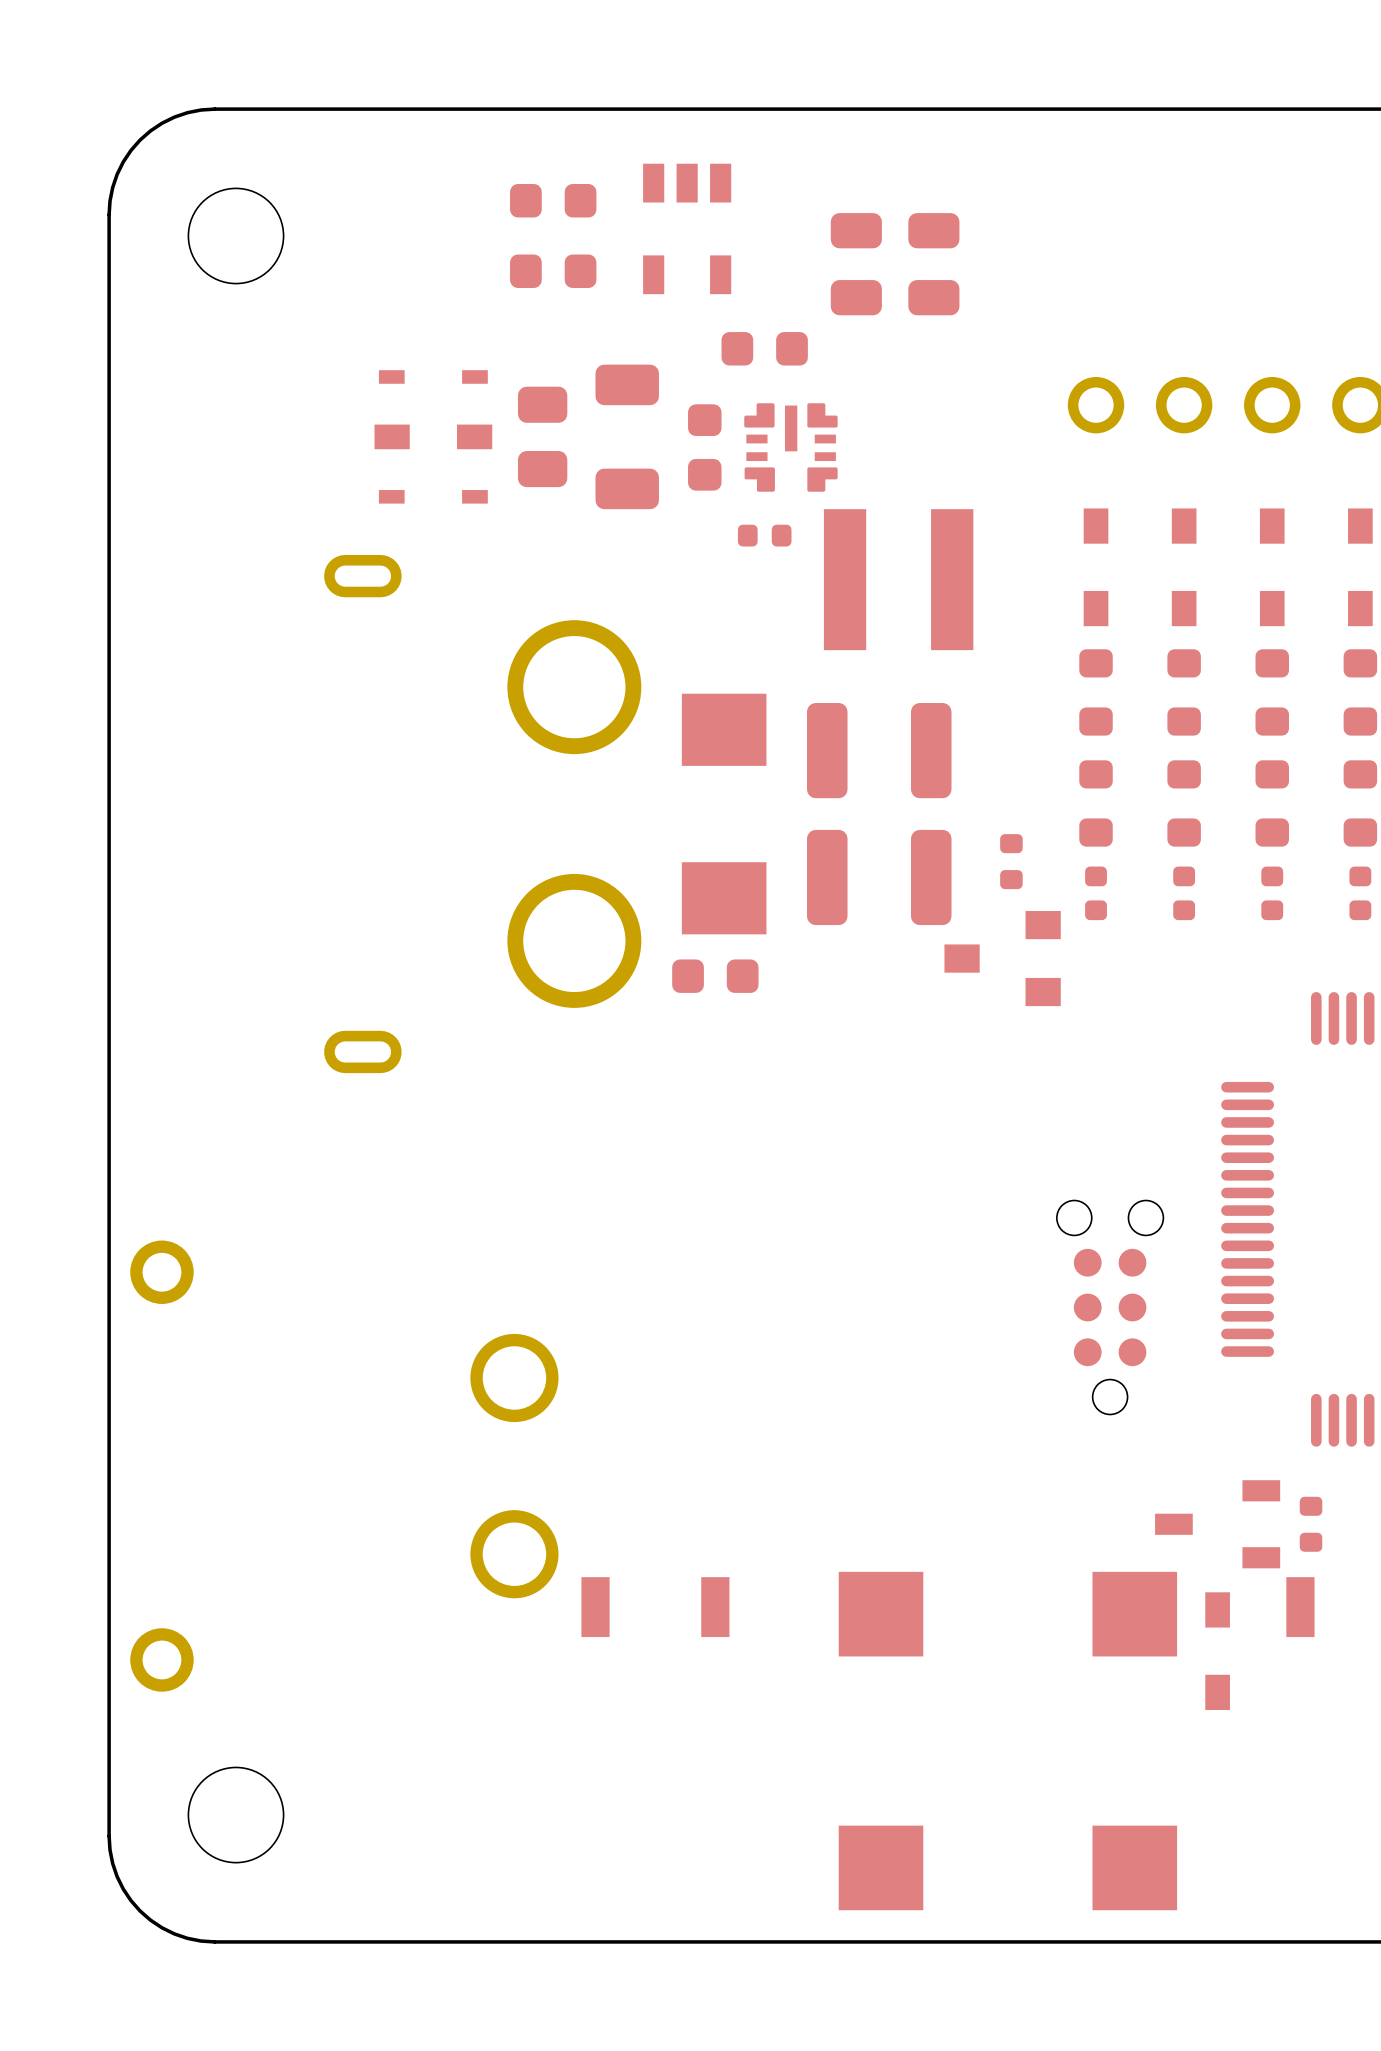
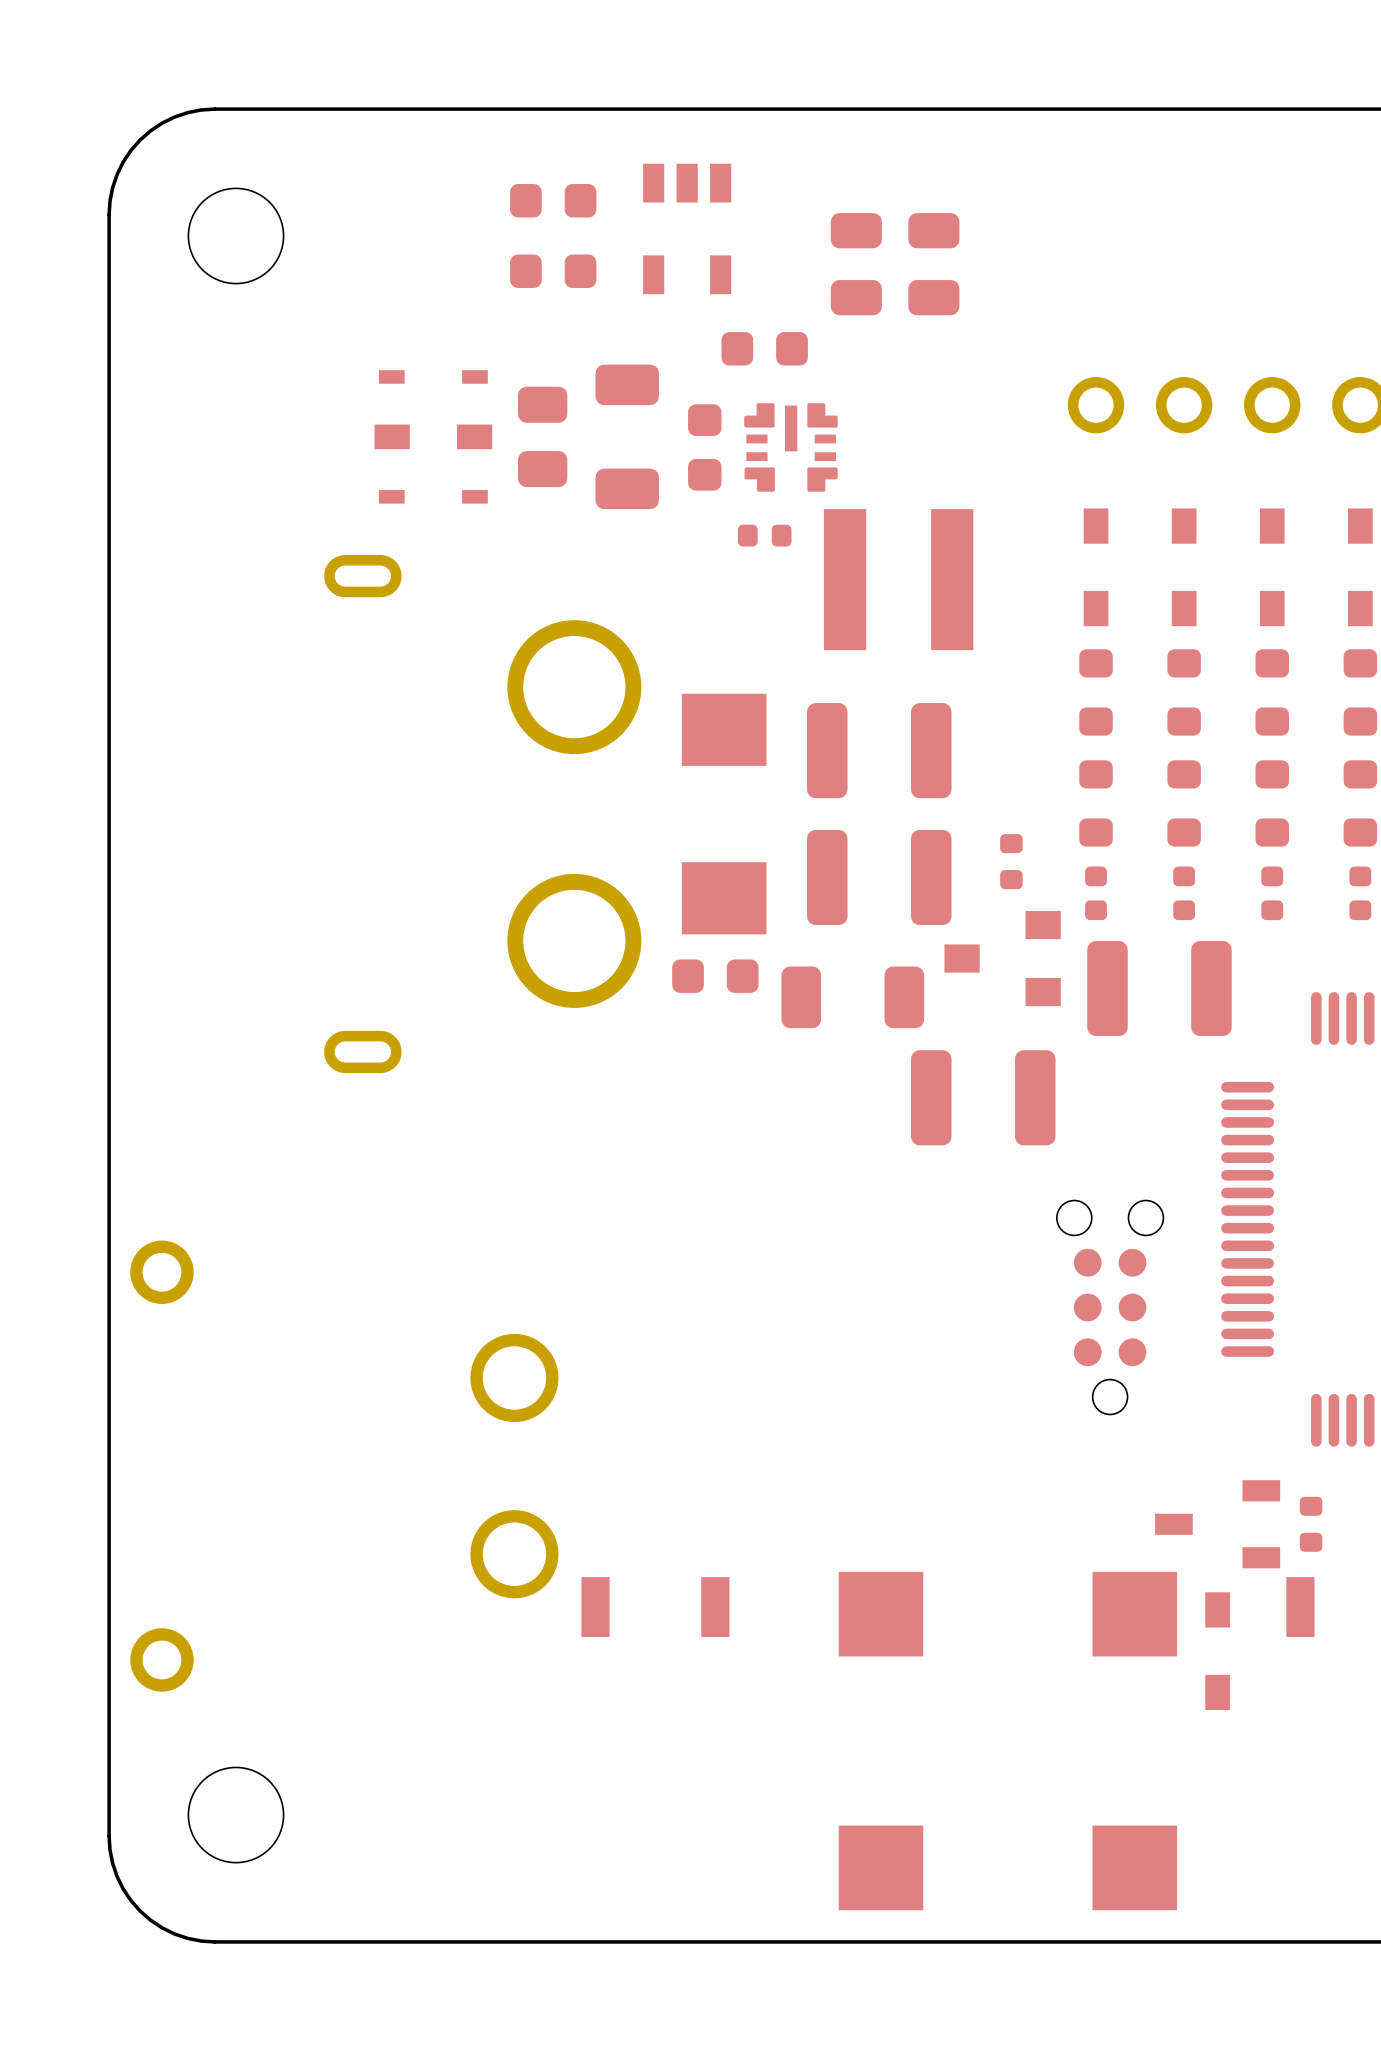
part: none -> (1159, 988)
part: none -> (852, 997)
part: none -> (983, 1097)

